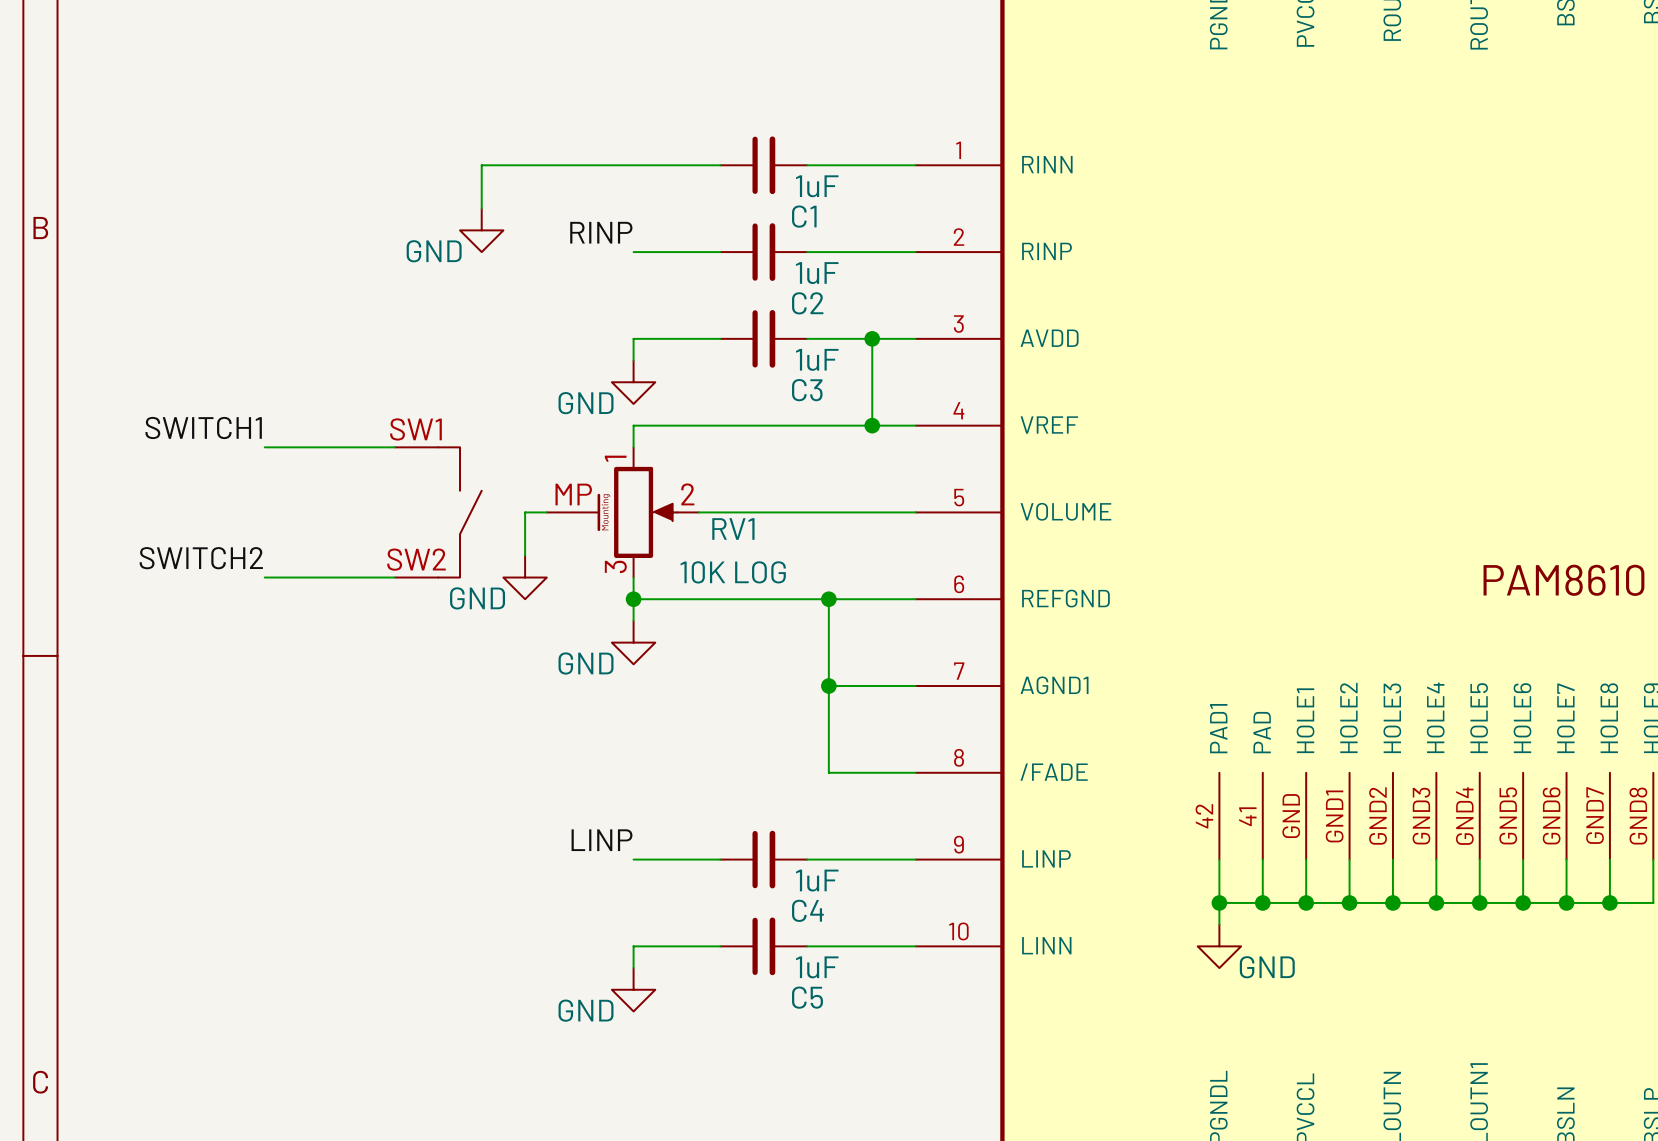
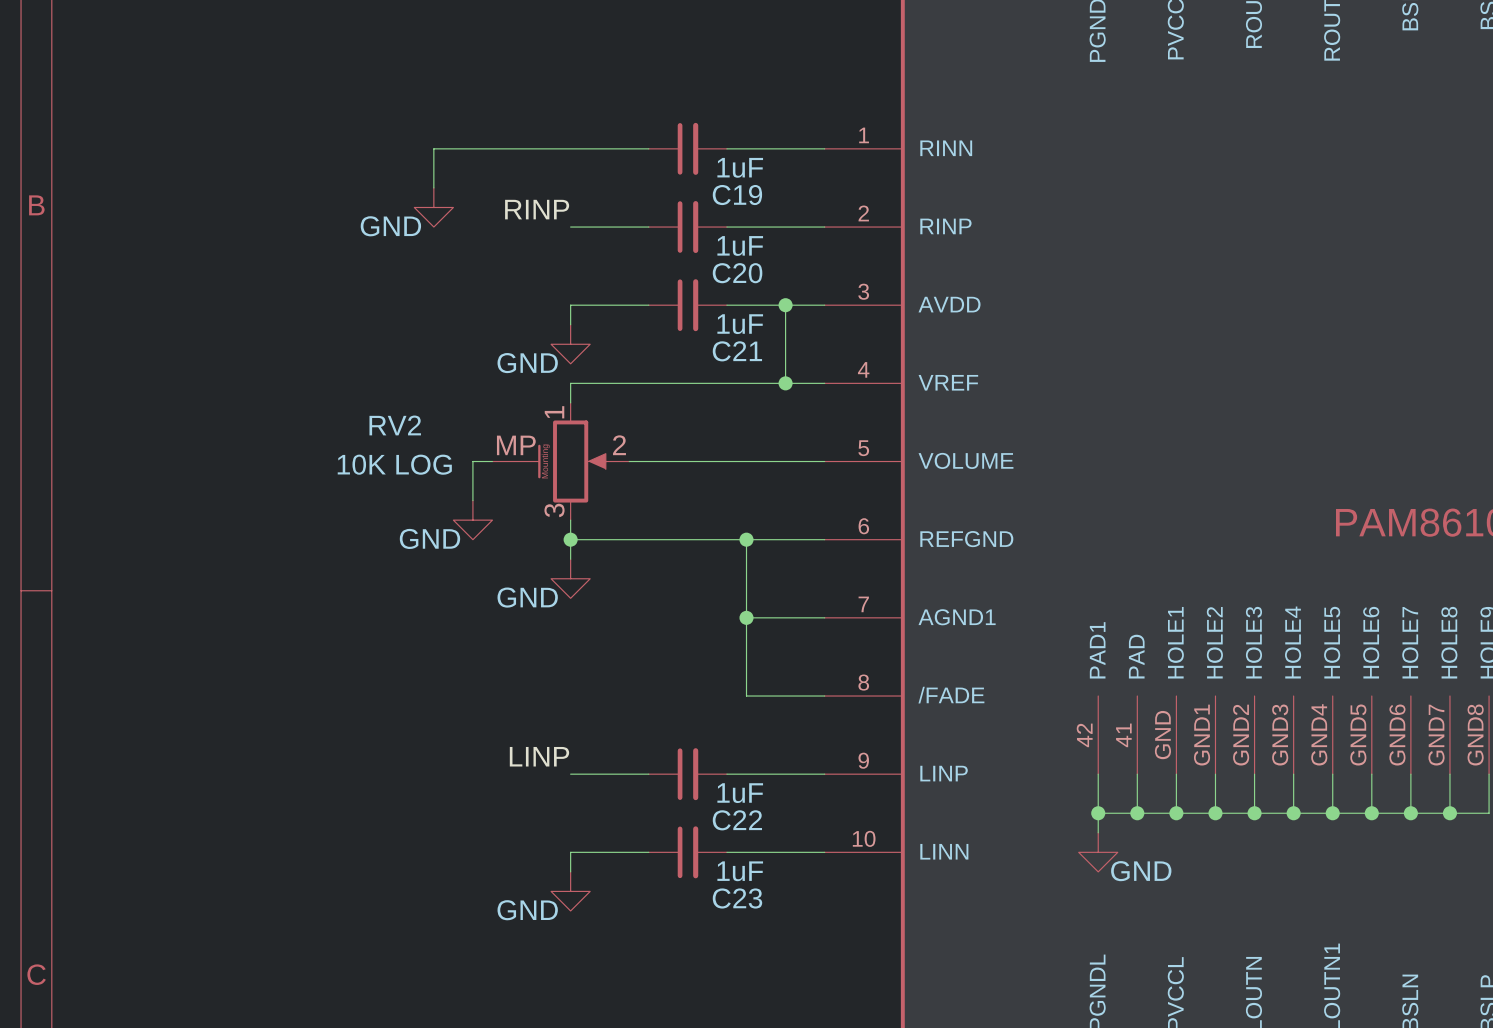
C1 name: C1 (804, 216) -> C19 (737, 195)
C2 name: C2 (807, 303) -> C20 (737, 273)
C3 name: C3 (807, 390) -> C21 (737, 351)
label: SWITCH1 (203, 428) -> none
wire: (264, 447) (394, 447) -> none
RV1: 10K LOG (546, 512) -> none
RV2: none -> 10K LOG (560, 461)
label: SWITCH2 (201, 558) -> none
wire: (264, 577) (394, 577) -> none
C4 name: C4 (807, 910) -> C22 (737, 820)
C5 name: C5 (807, 997) -> C23 (737, 898)

